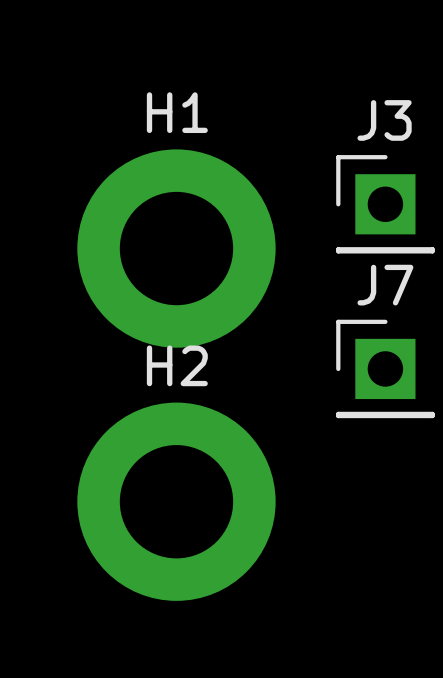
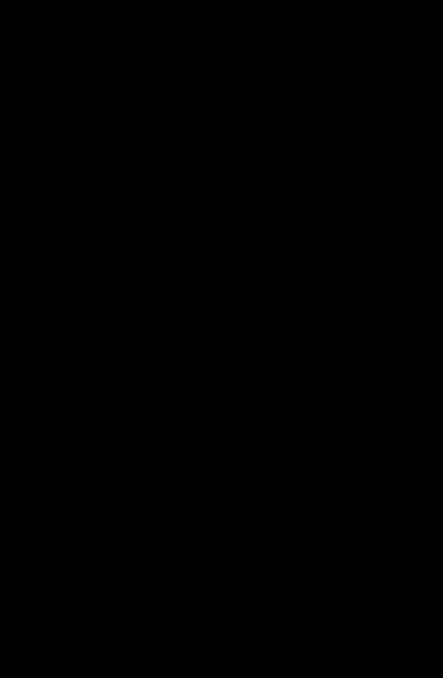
J3: (385, 204) -> none
H1: (176, 248) -> none
J7: (385, 368) -> none
H2: (176, 501) -> none

